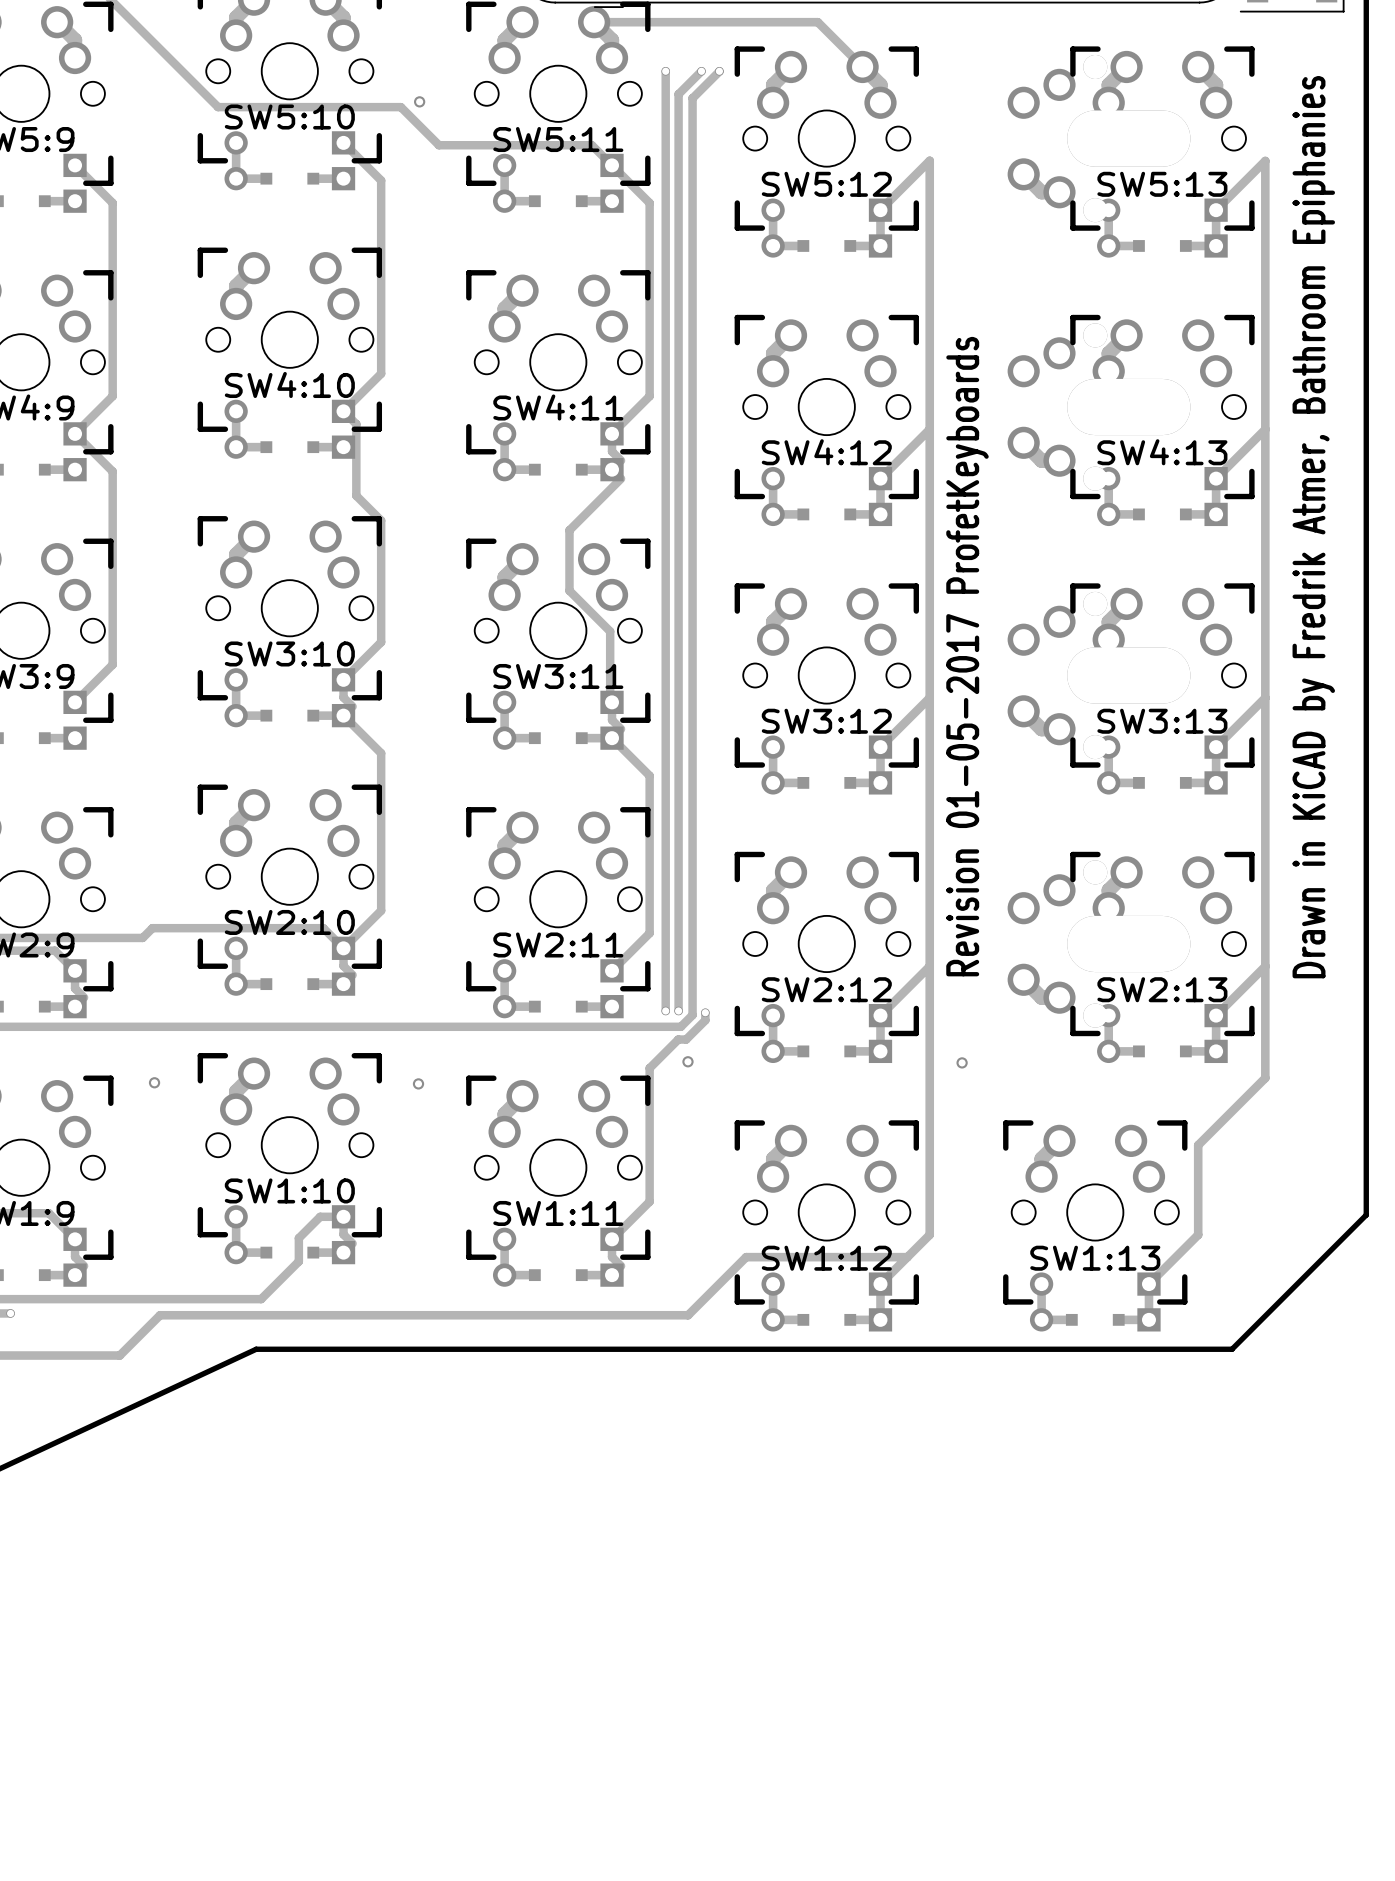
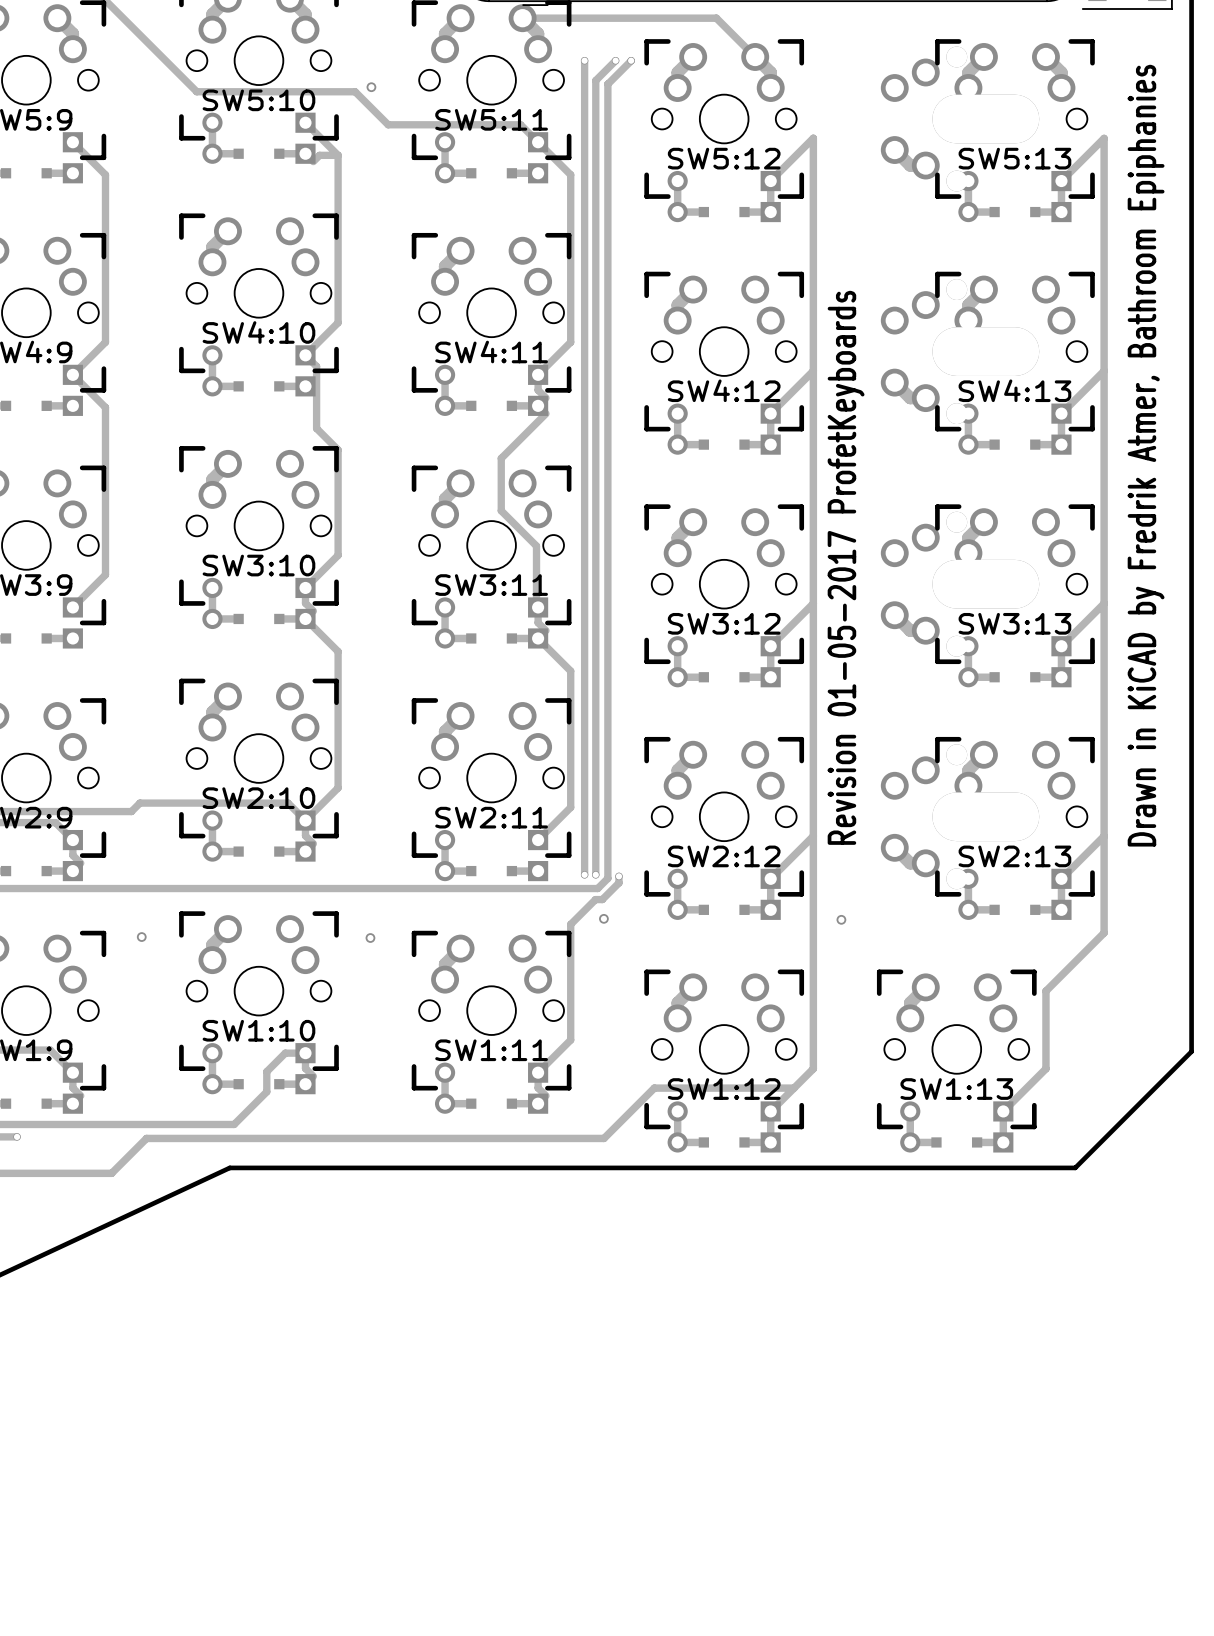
track: none -> (338, 155) (319, 155) (313, 161)

